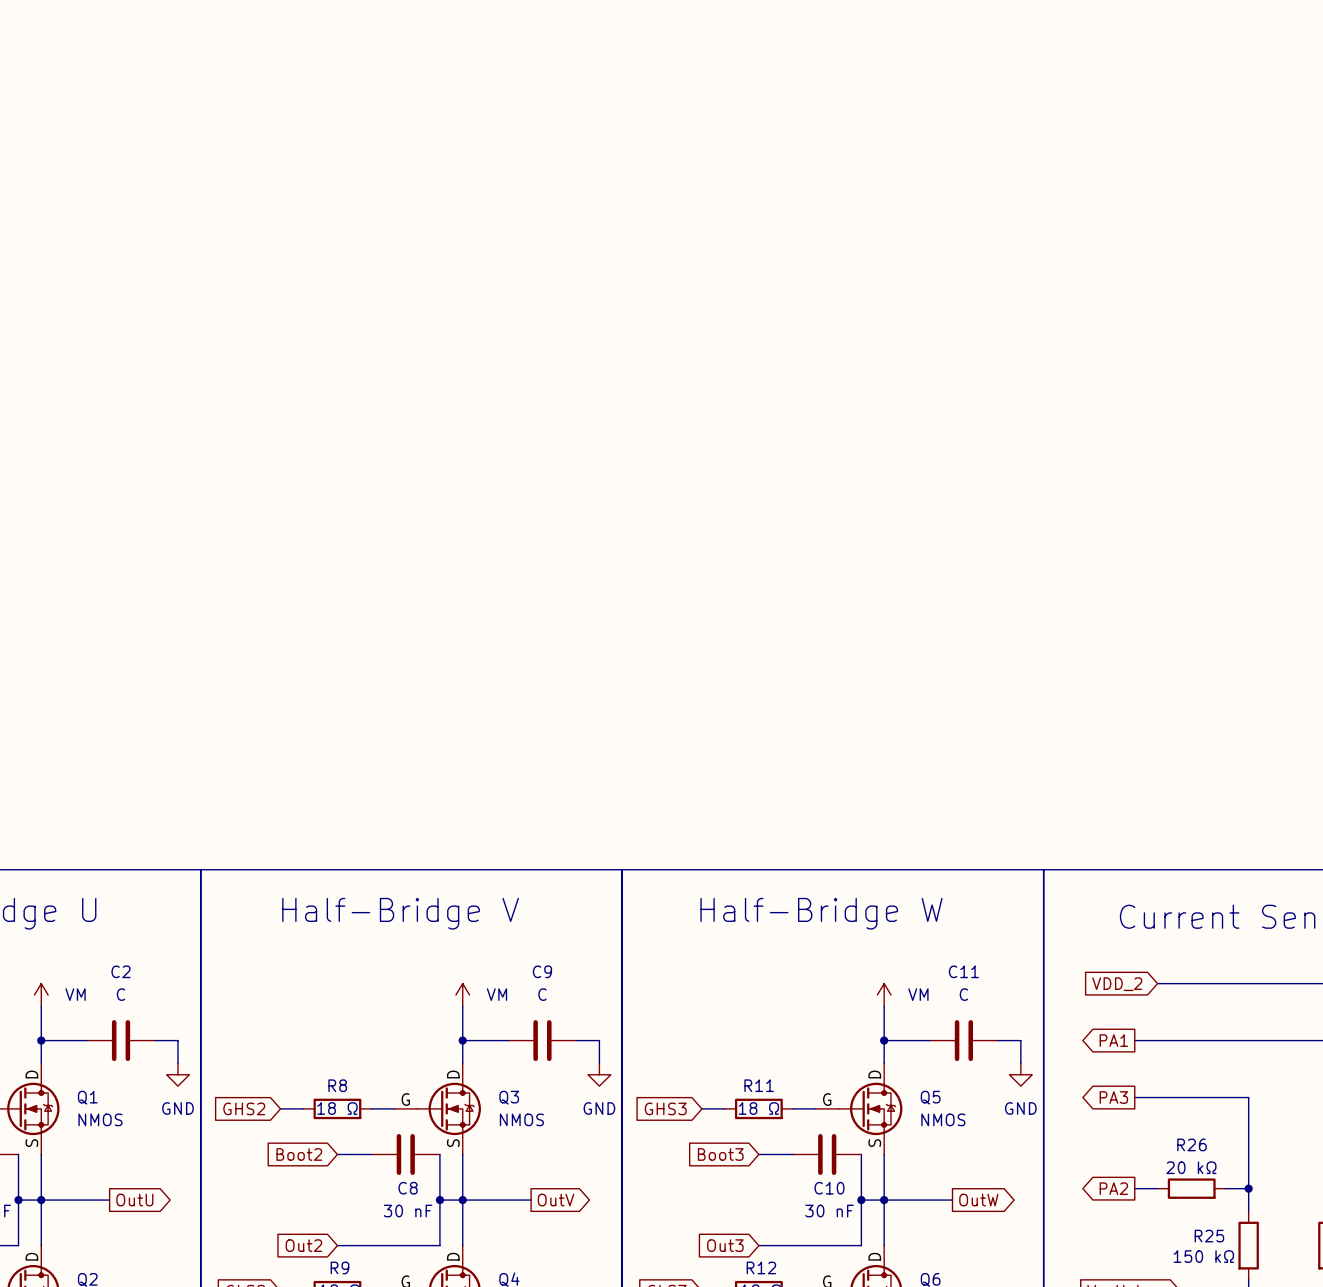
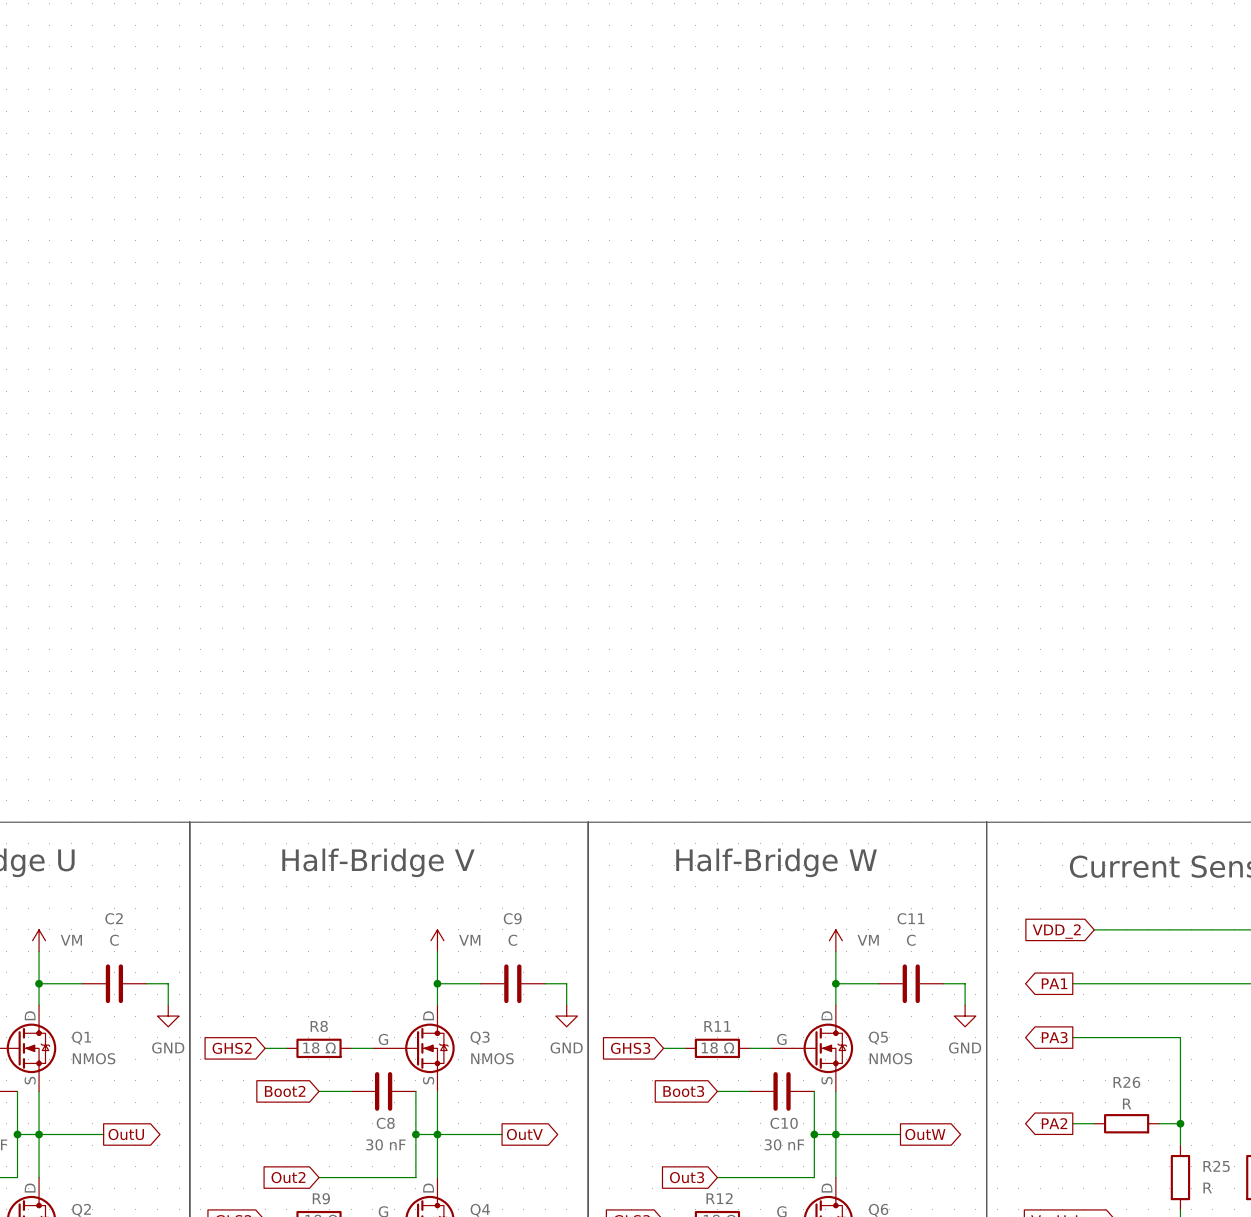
R26 value: 20 kΩ (1191, 1167) -> R (1127, 1103)
R25 name position: R25 (1209, 1236) -> R25 (1216, 1166)
R25 value: 150 kΩ (1203, 1256) -> R (1207, 1187)

